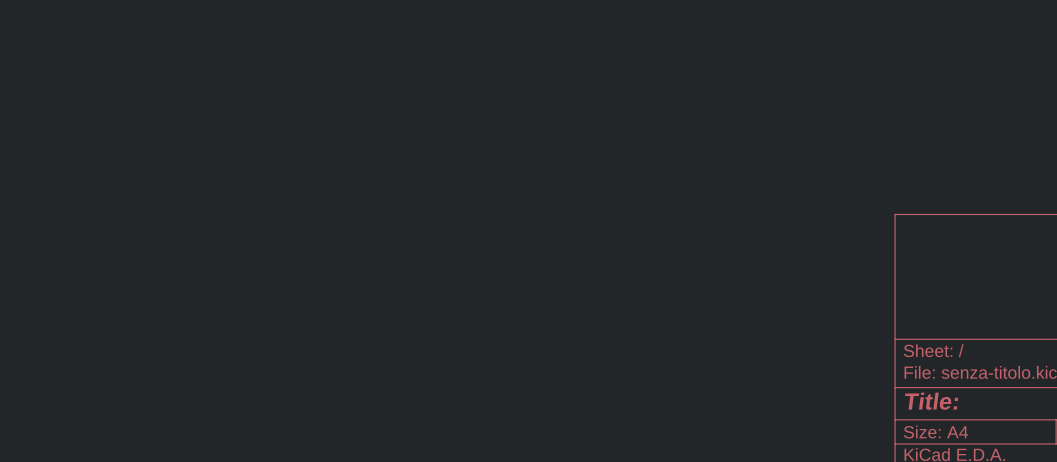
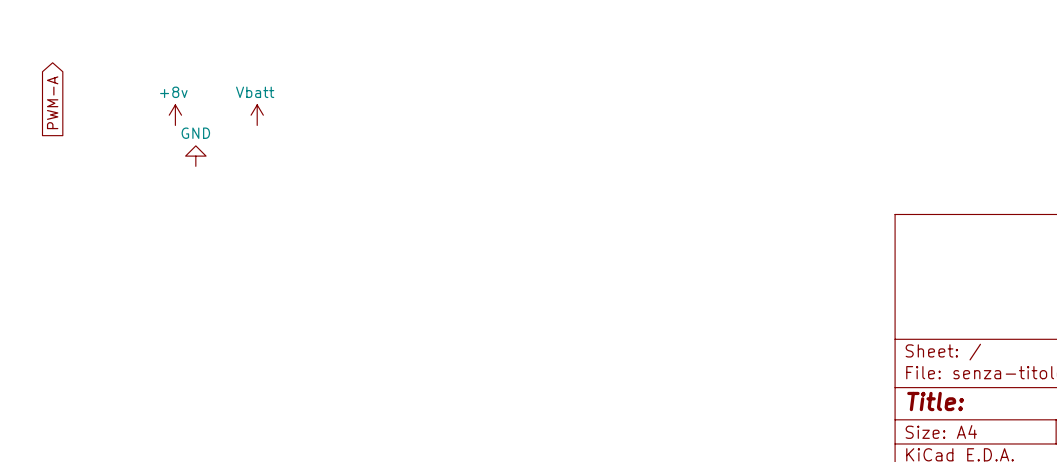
global label: none -> PWM-A (52, 102)
power symbol: none -> +8v (175, 115)
power symbol: none -> Vbatt (257, 115)
power symbol: none -> GND (195, 156)

